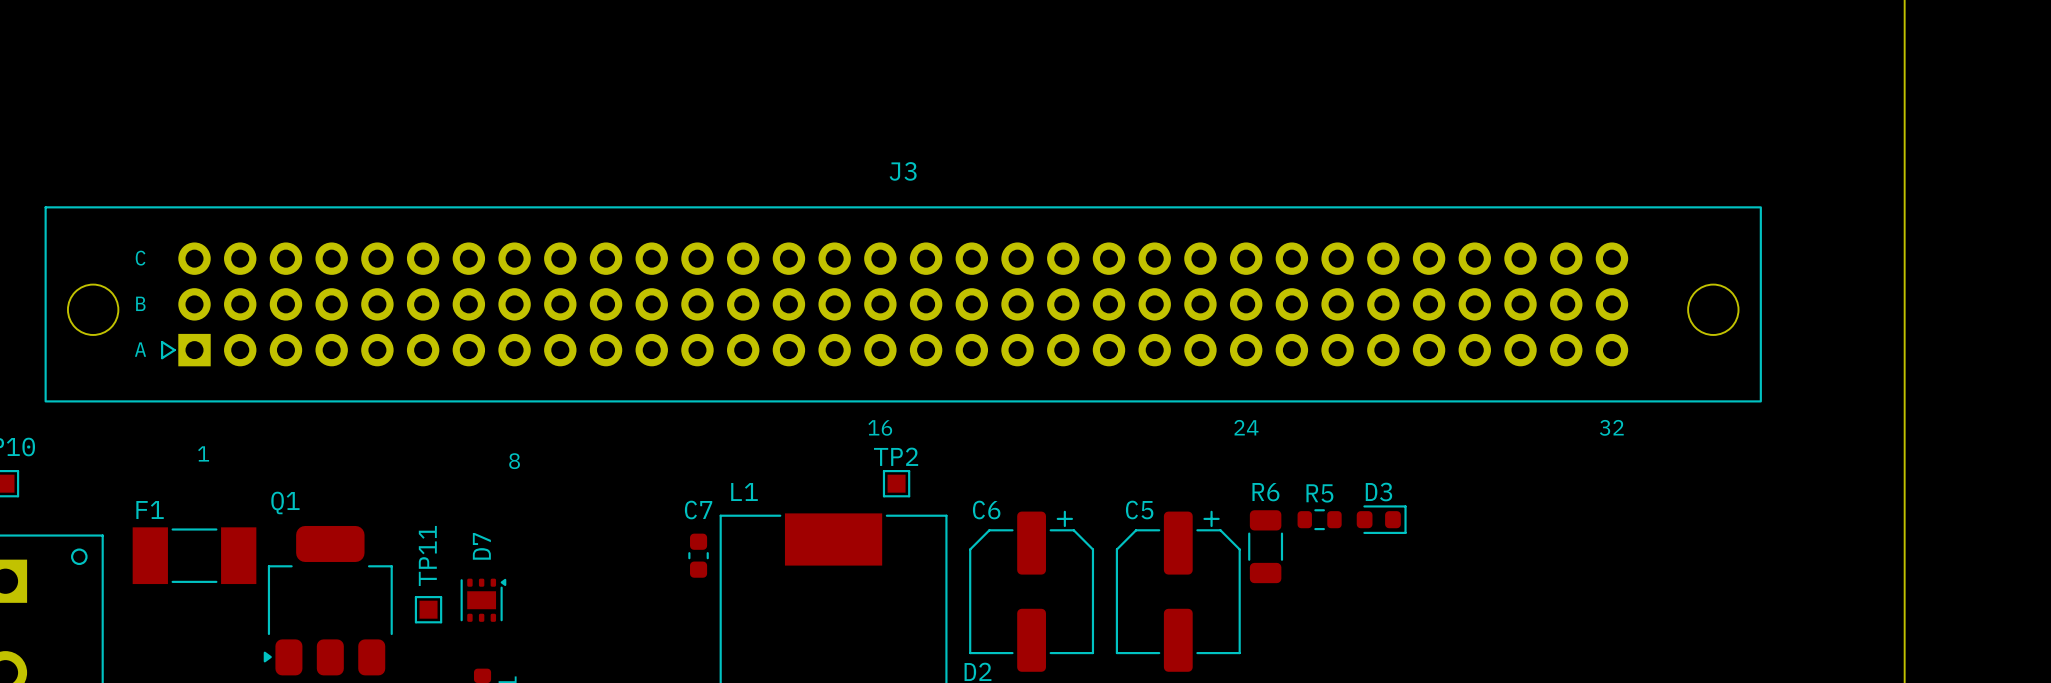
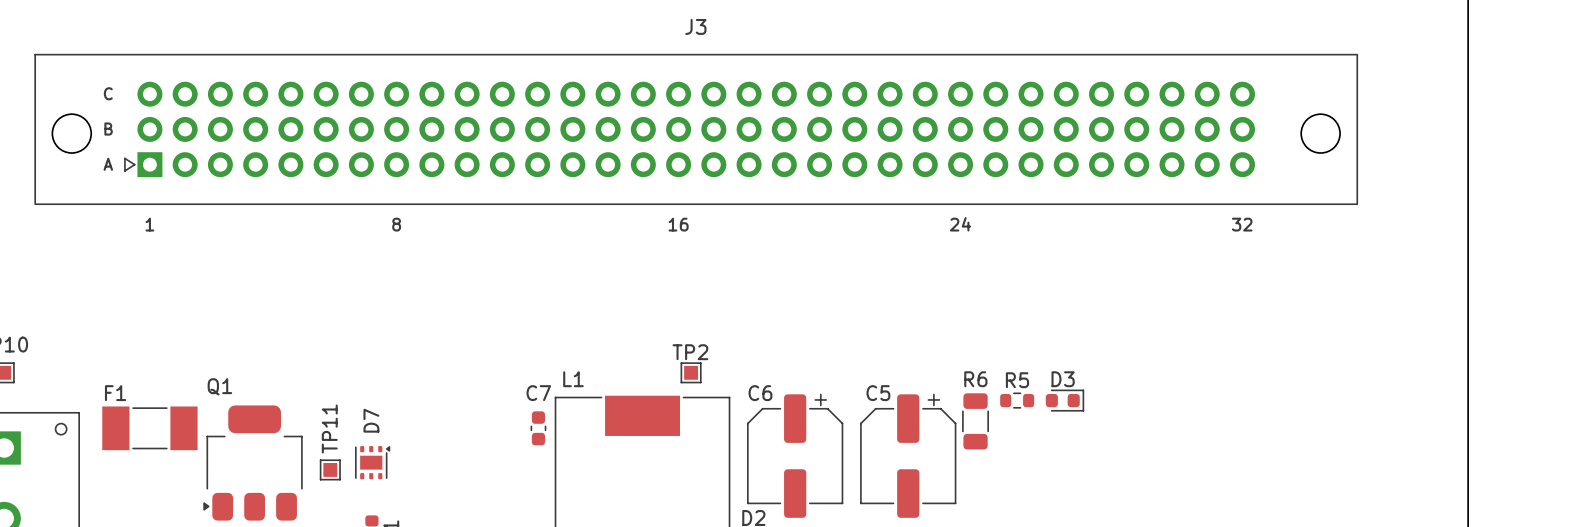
J3 position: (903, 304) -> (696, 129)
J3 text position: 1 (203, 453) -> 1 (149, 224)
J3 text position: 8 (514, 461) -> 8 (396, 224)

